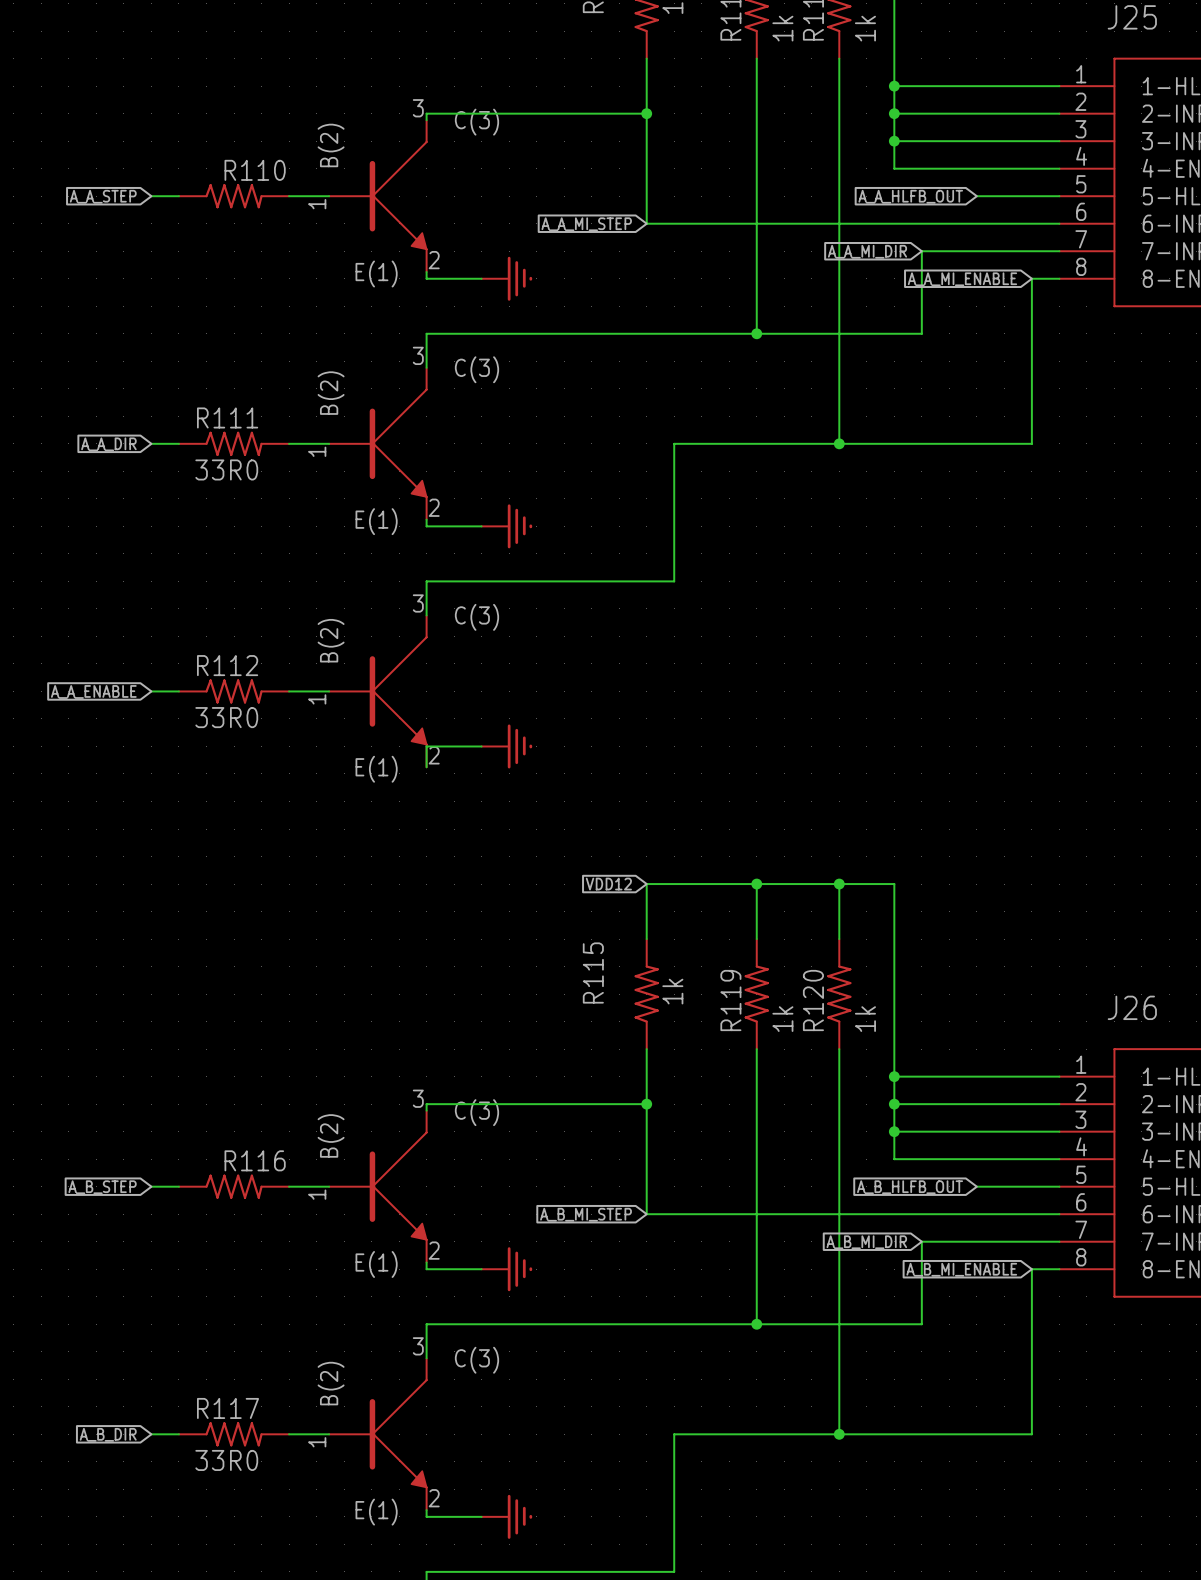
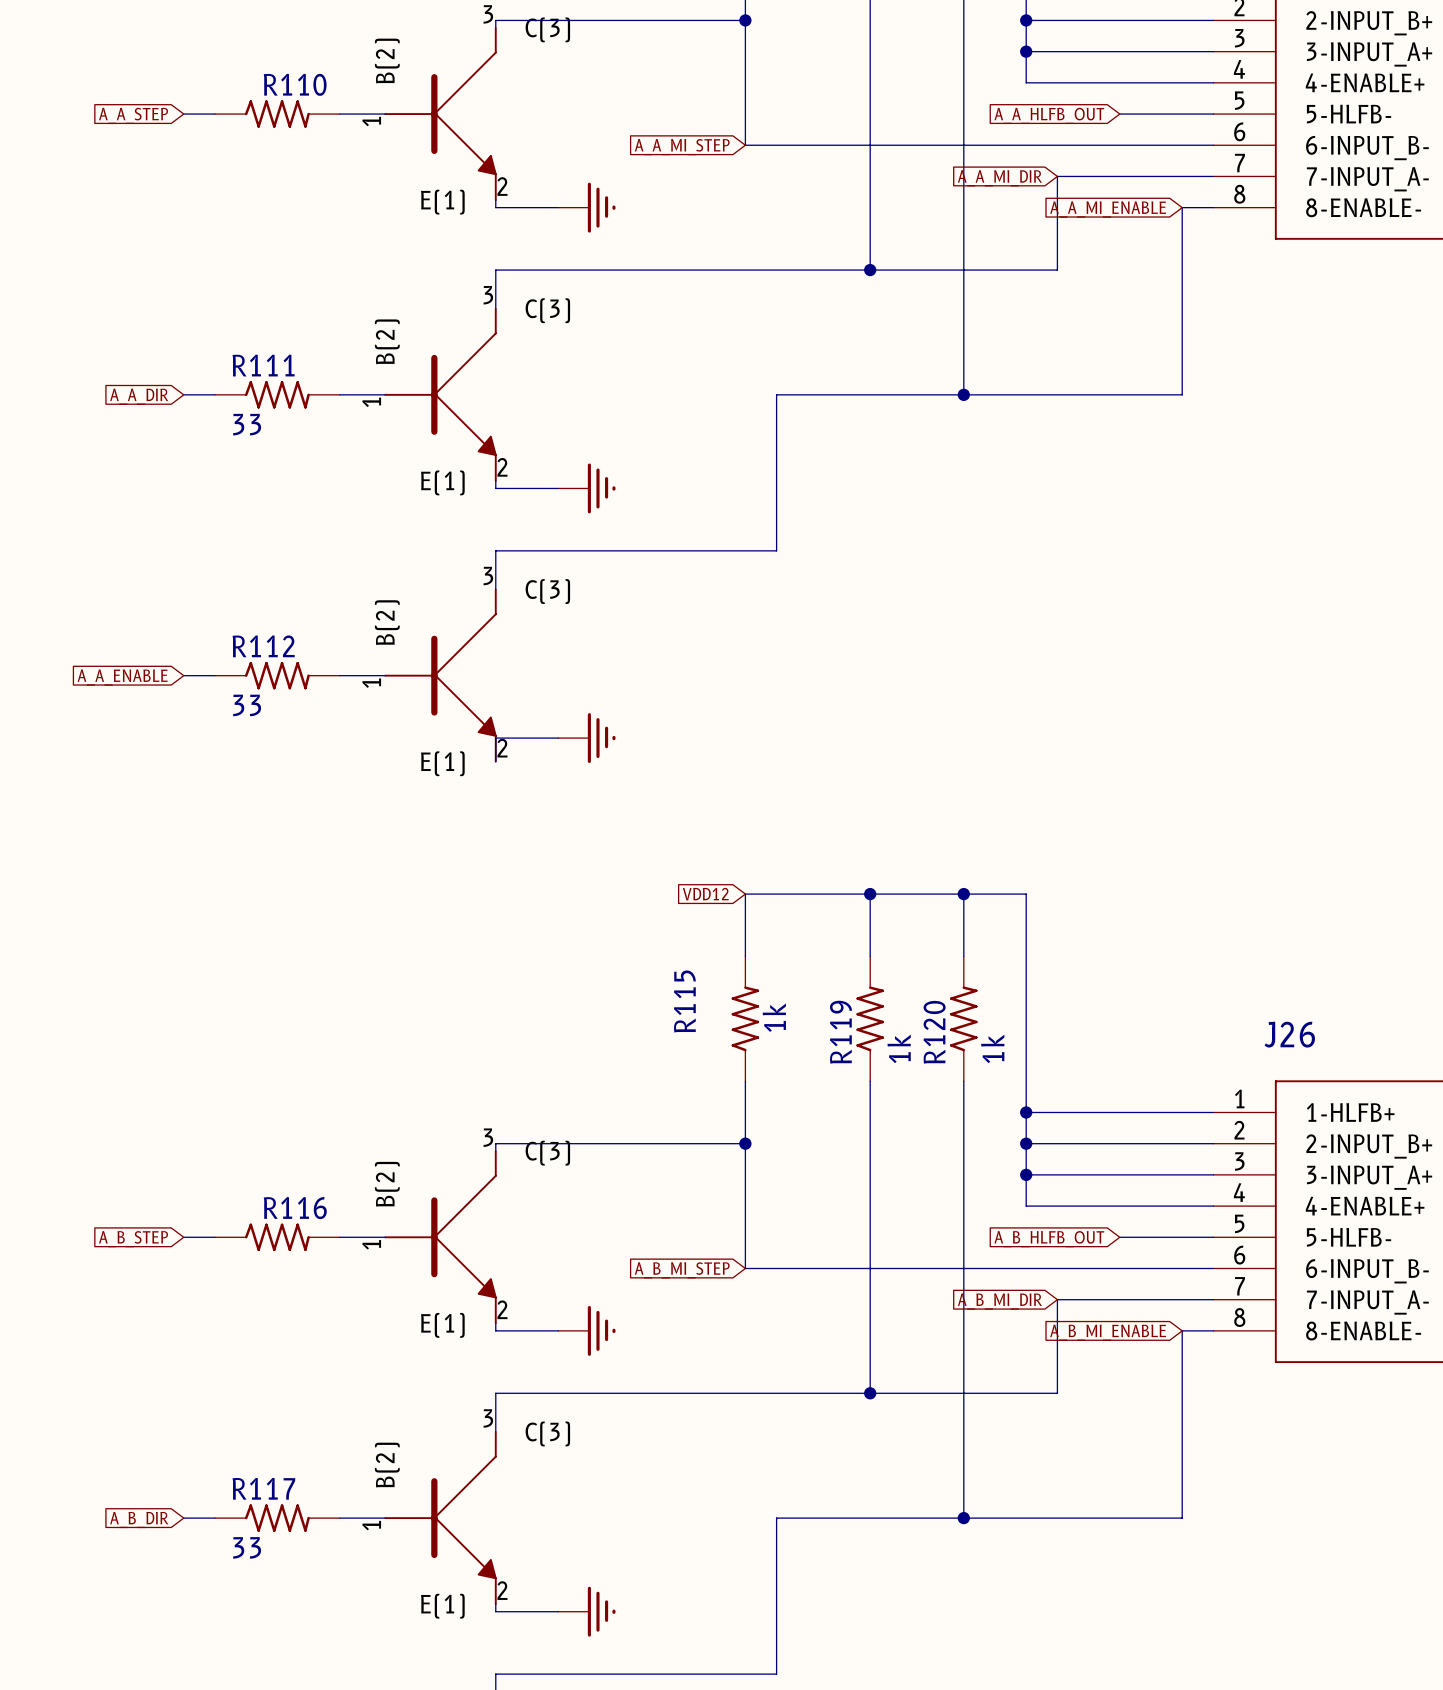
R111 value: 33R0 (226, 469) -> 33 (247, 424)
R112 value: 33R0 (226, 717) -> 33 (247, 705)
R117 value: 33R0 (226, 1460) -> 33 (247, 1547)

